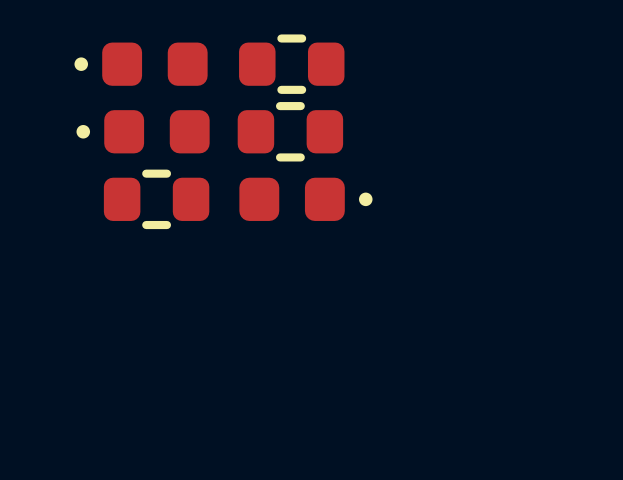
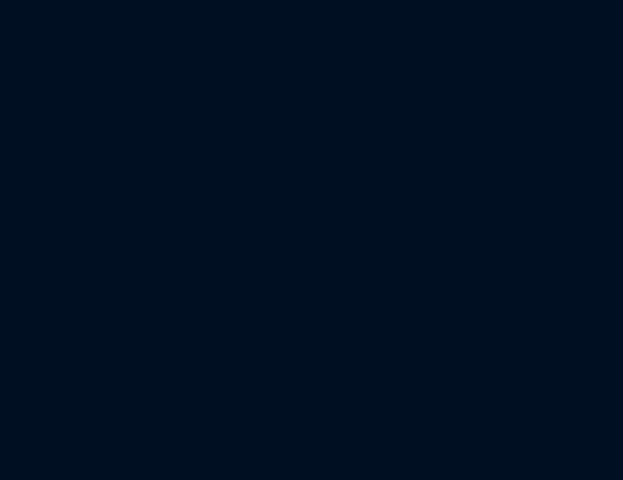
part: (141, 64) -> none
part: (291, 64) -> none
part: (143, 131) -> none
part: (290, 131) -> none
part: (156, 199) -> none
part: (305, 199) -> none

